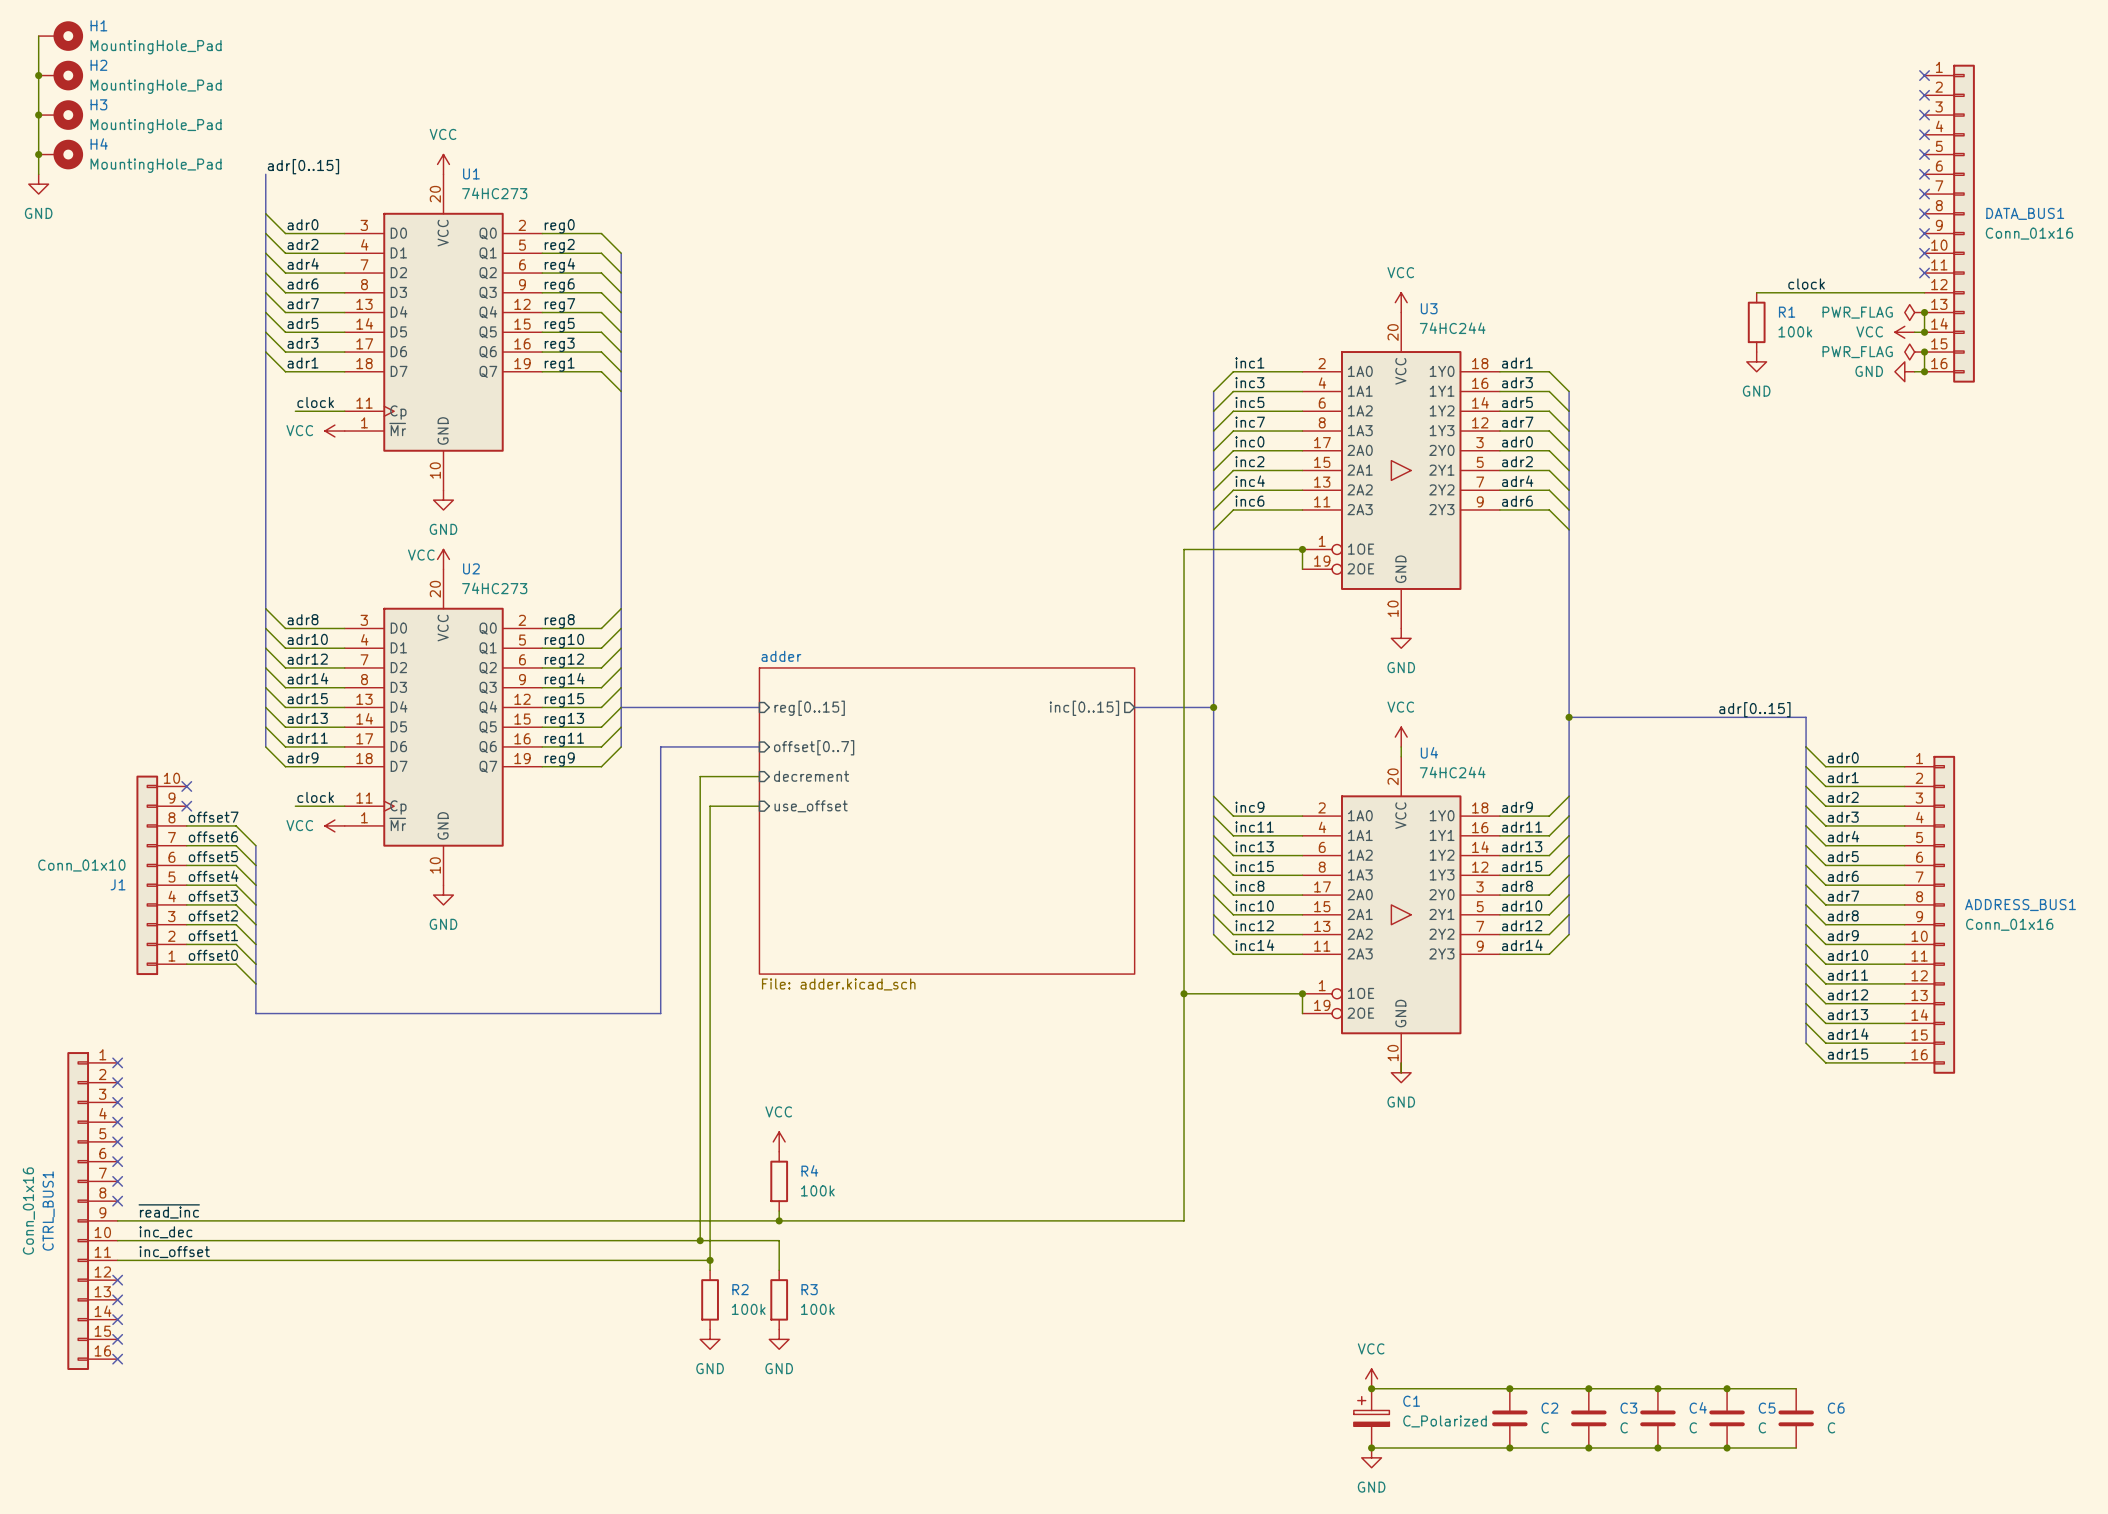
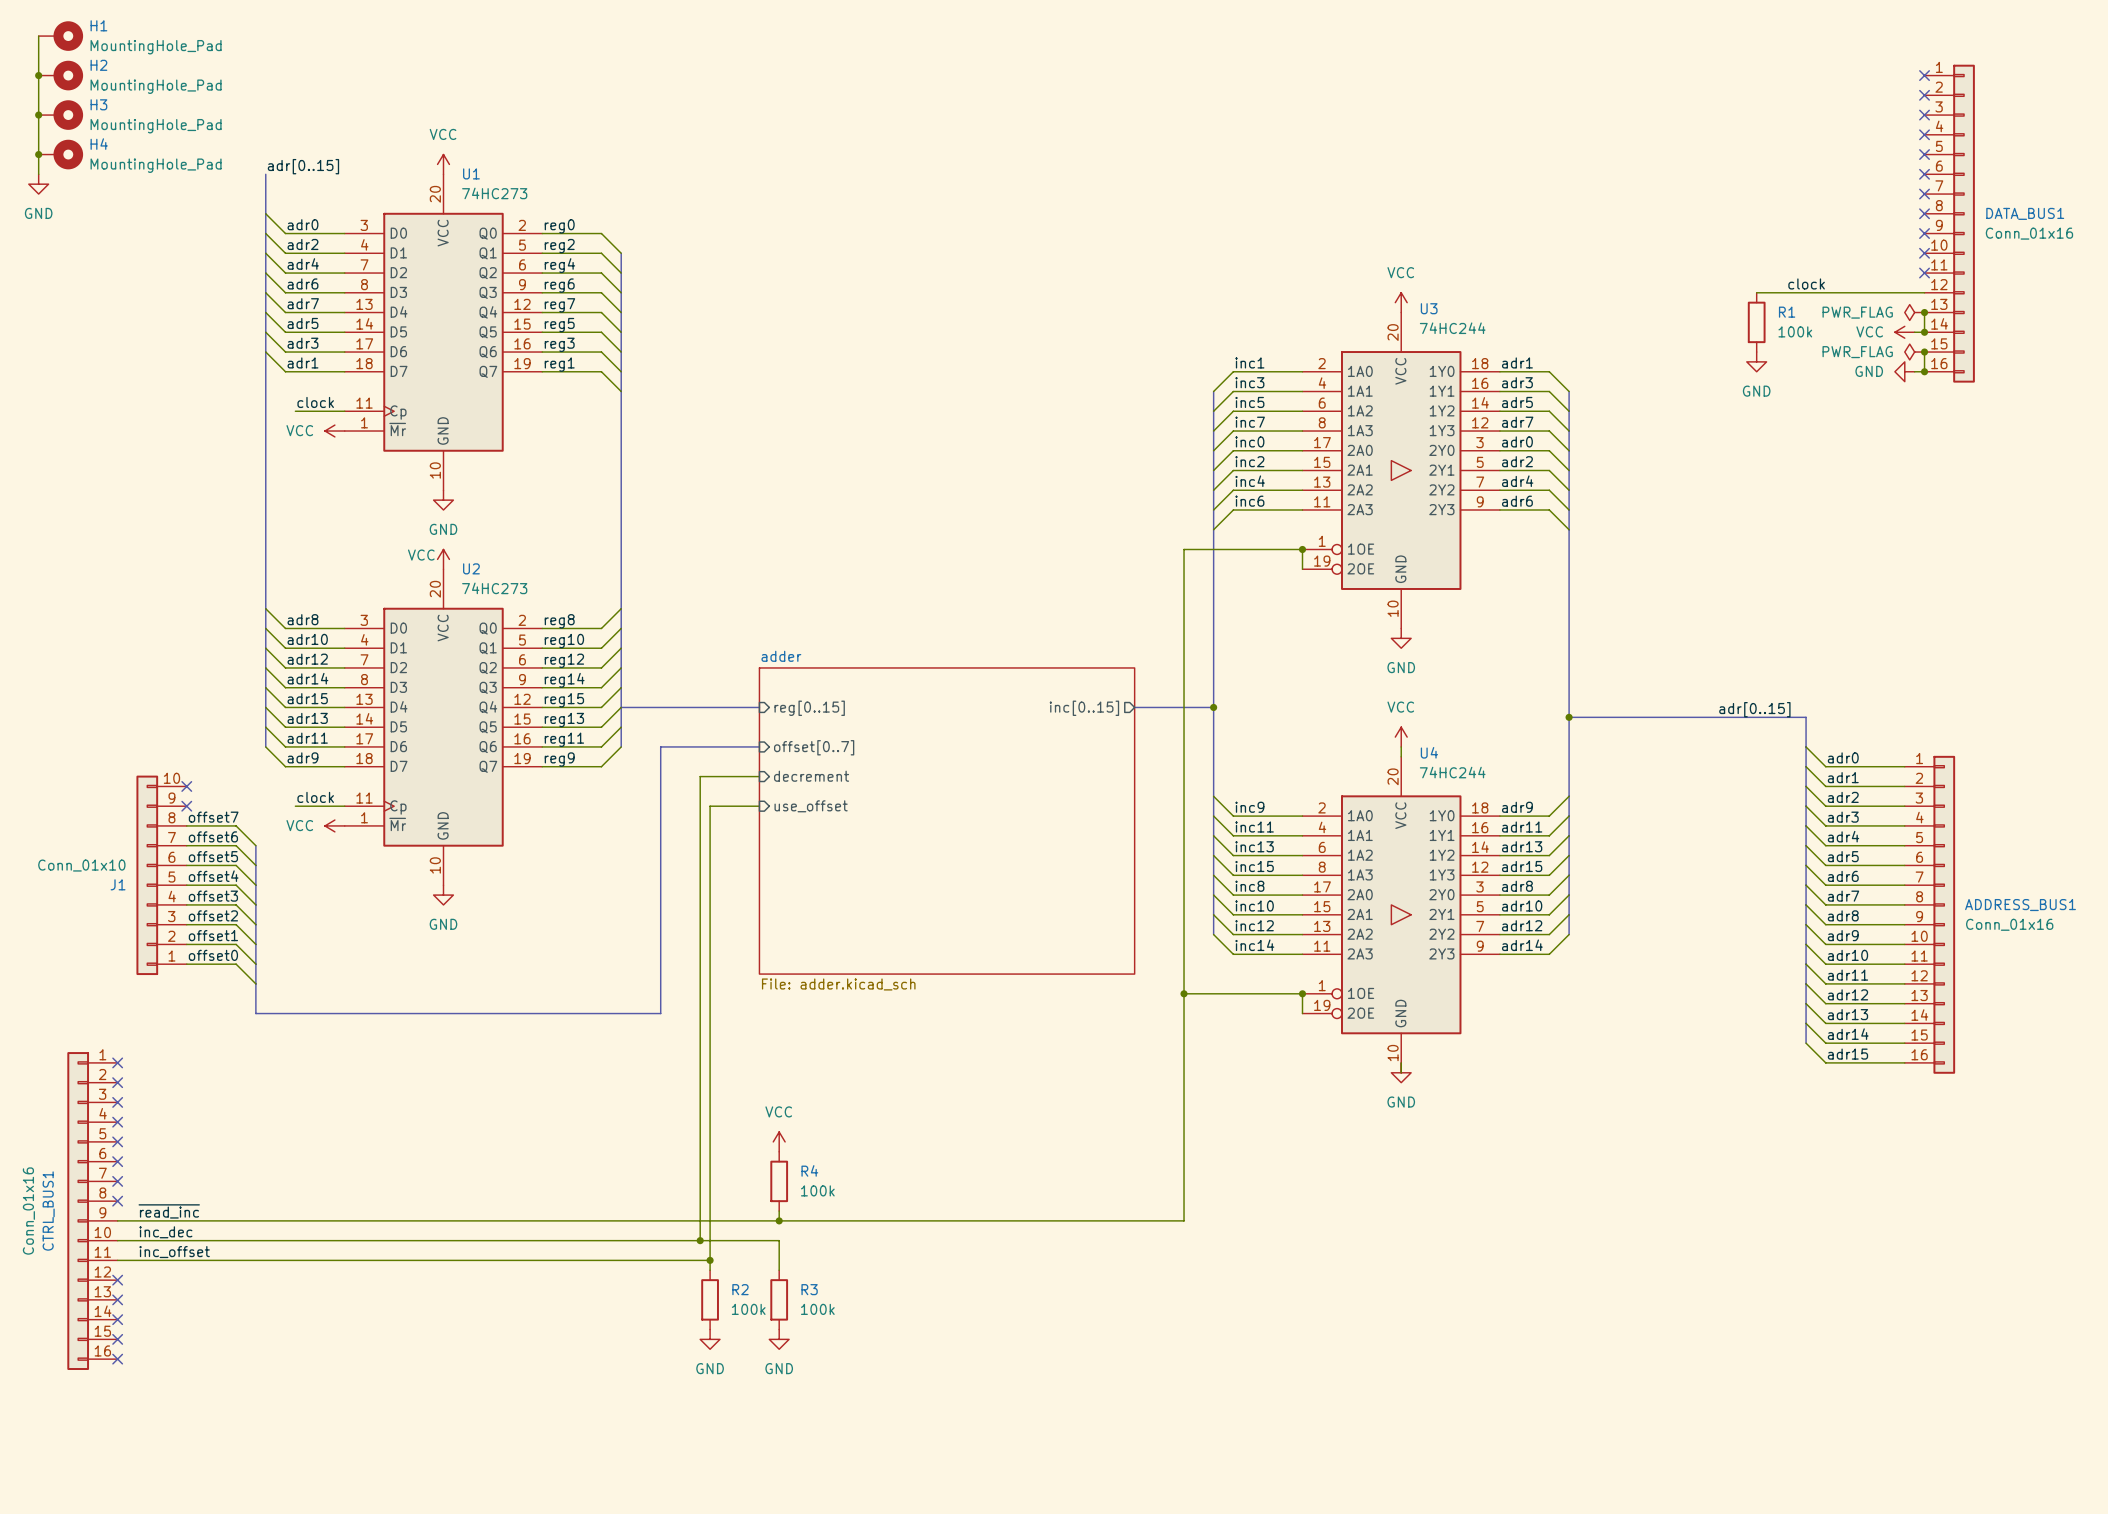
power symbol: VCC (1371, 1378) -> none
wire: (1371, 1388) (1796, 1388) -> none
junction: (1371, 1388) -> none
junction: (1509, 1388) -> none
junction: (1588, 1388) -> none
junction: (1657, 1388) -> none
junction: (1727, 1388) -> none
C1: C_Polarized (1371, 1418) -> none
C2: C (1509, 1418) -> none
C3: C (1588, 1418) -> none
C4: C (1657, 1418) -> none
C5: C (1727, 1418) -> none
C6: C (1796, 1418) -> none
wire: (1371, 1447) (1796, 1447) -> none
junction: (1371, 1447) -> none
junction: (1509, 1447) -> none
junction: (1588, 1447) -> none
junction: (1657, 1447) -> none
junction: (1727, 1447) -> none
power symbol: GND (1371, 1457) -> none

